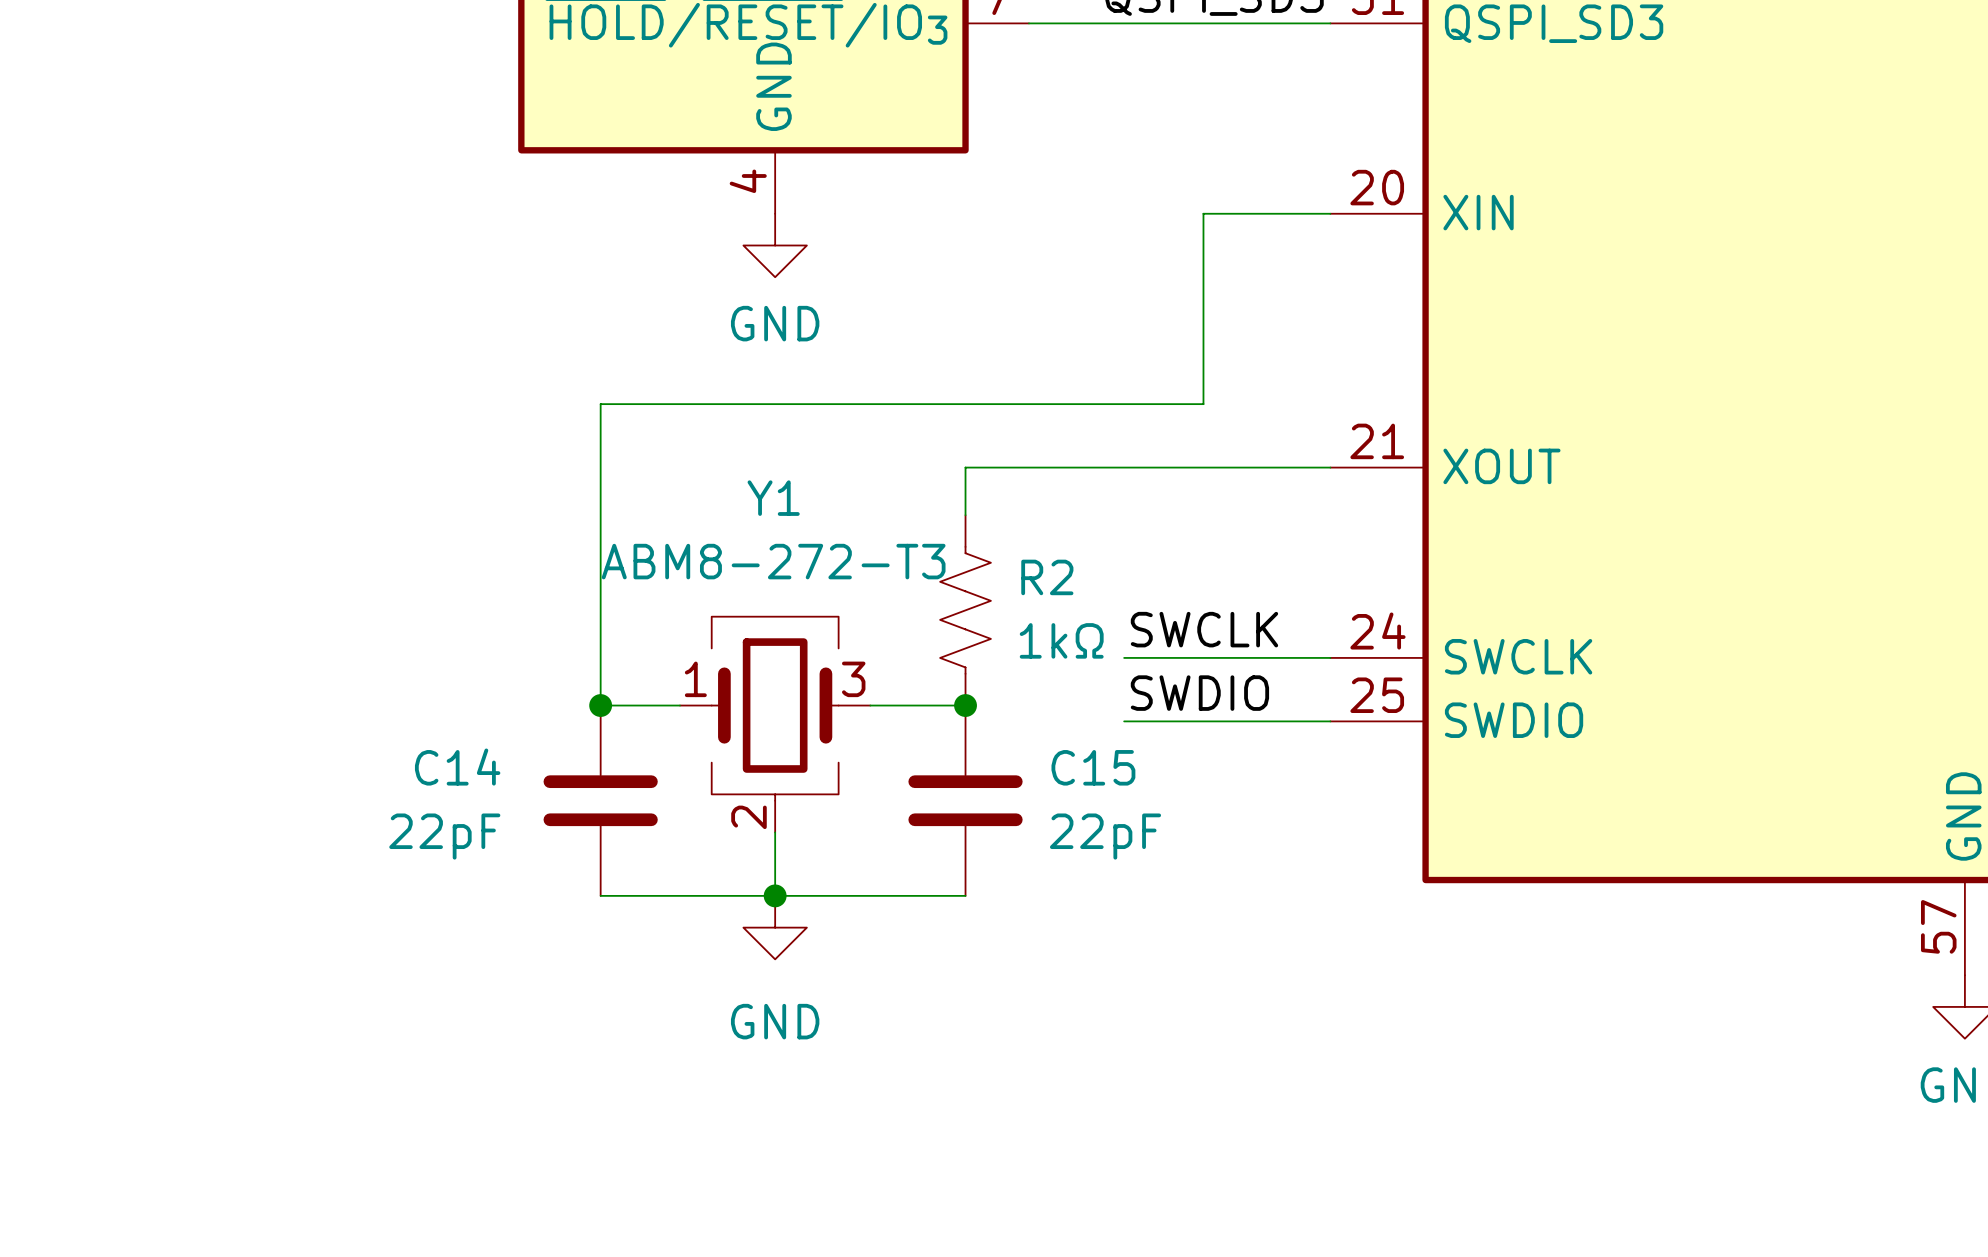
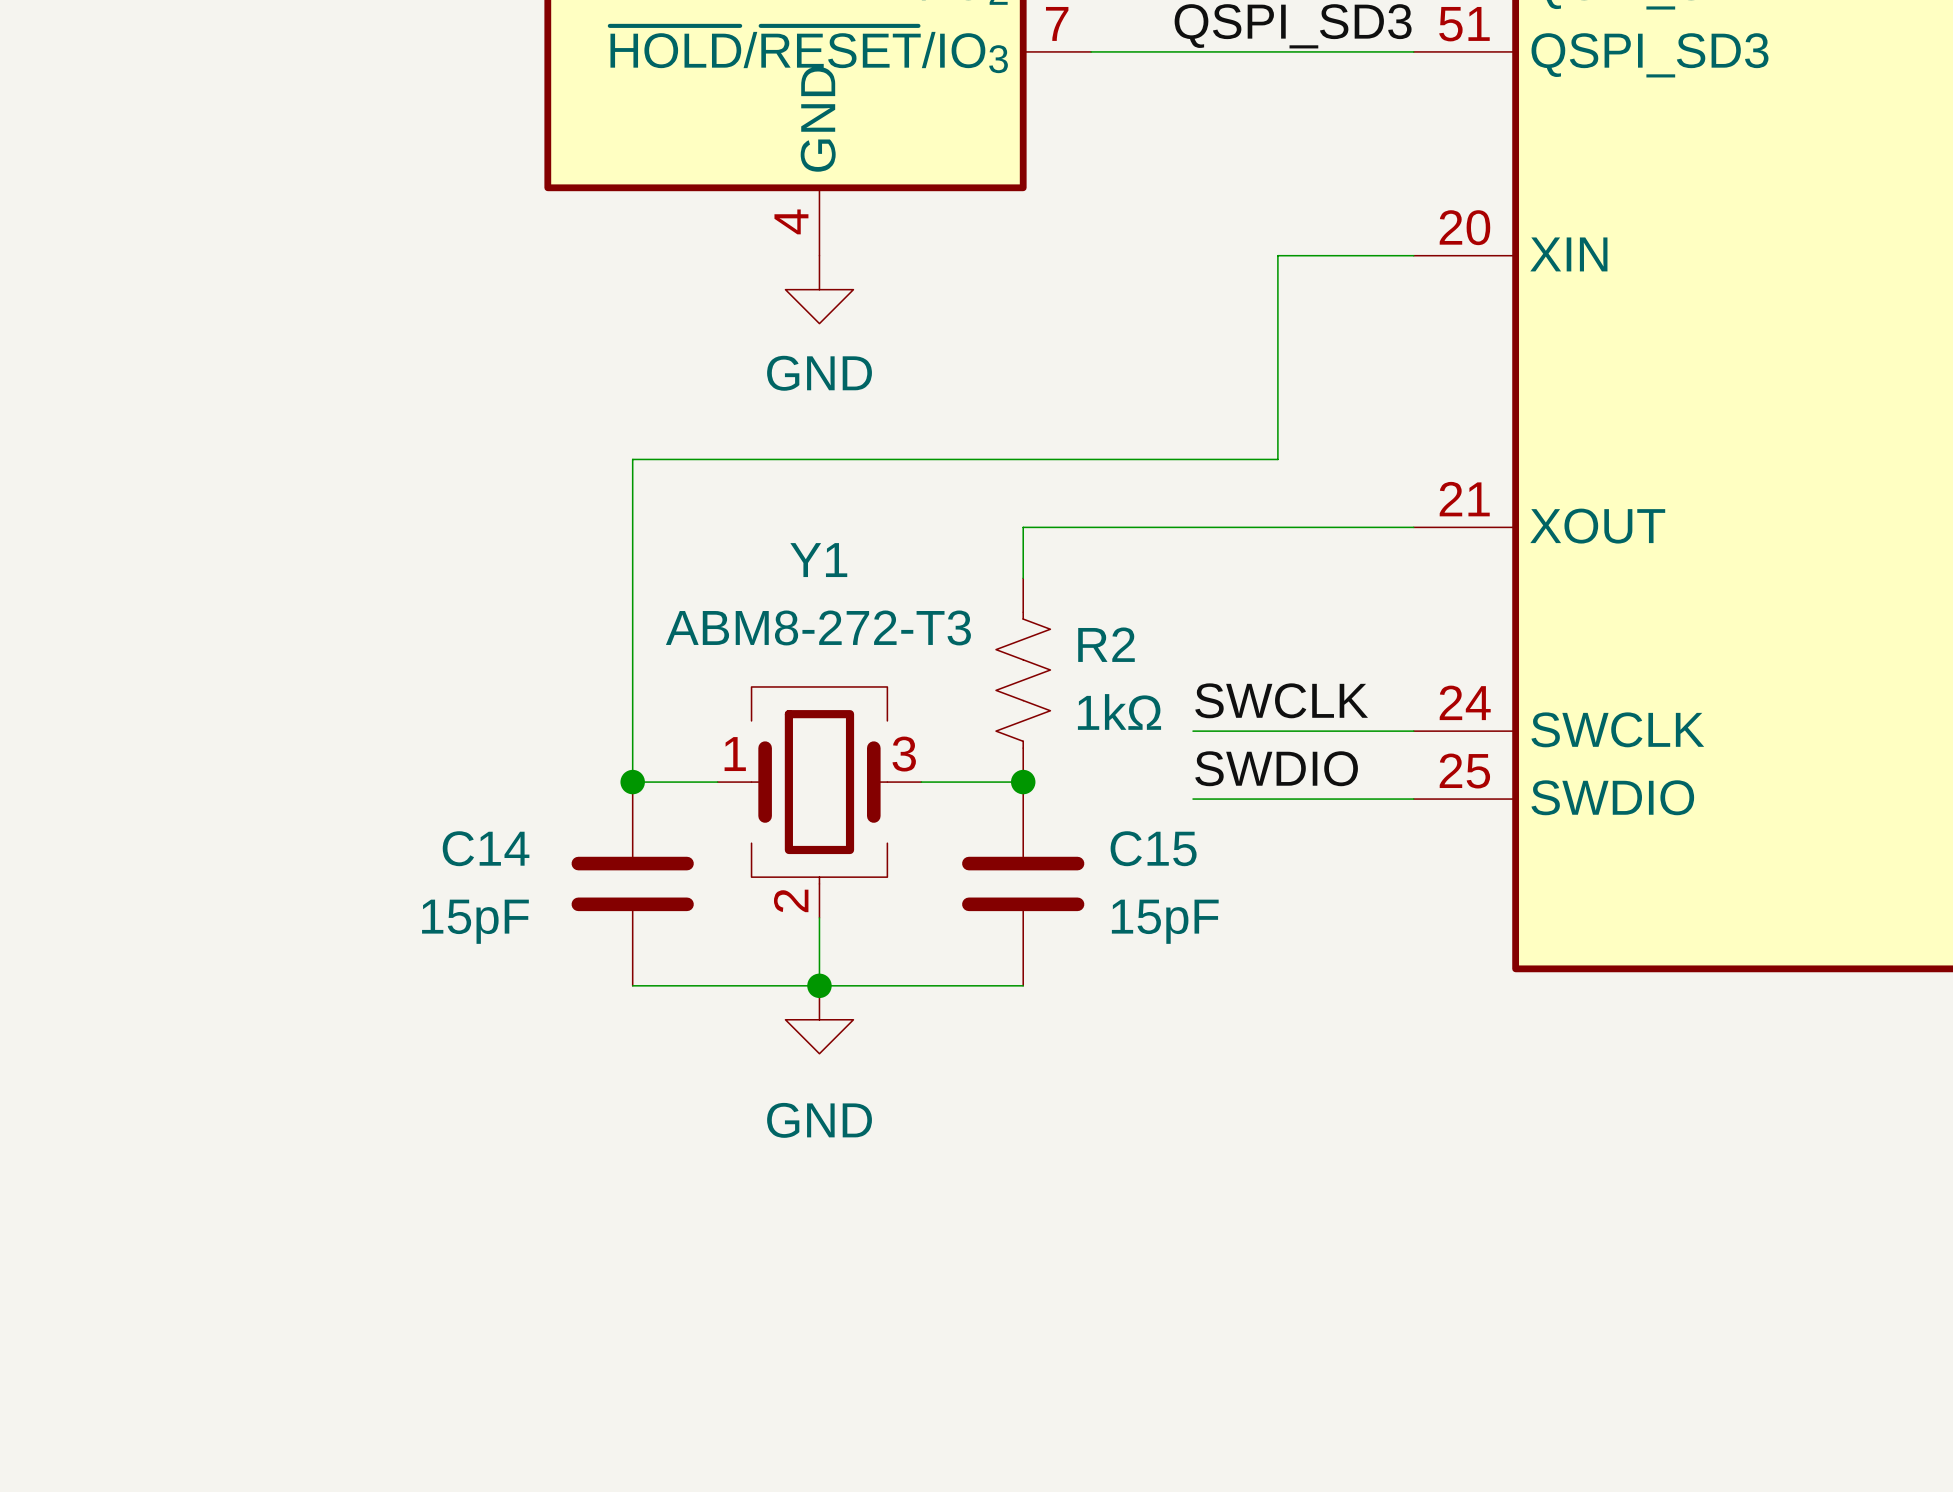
C14 value: 22pF (444, 836) -> 15pF (475, 921)
C15 value: 22pF (1105, 836) -> 15pF (1165, 921)

